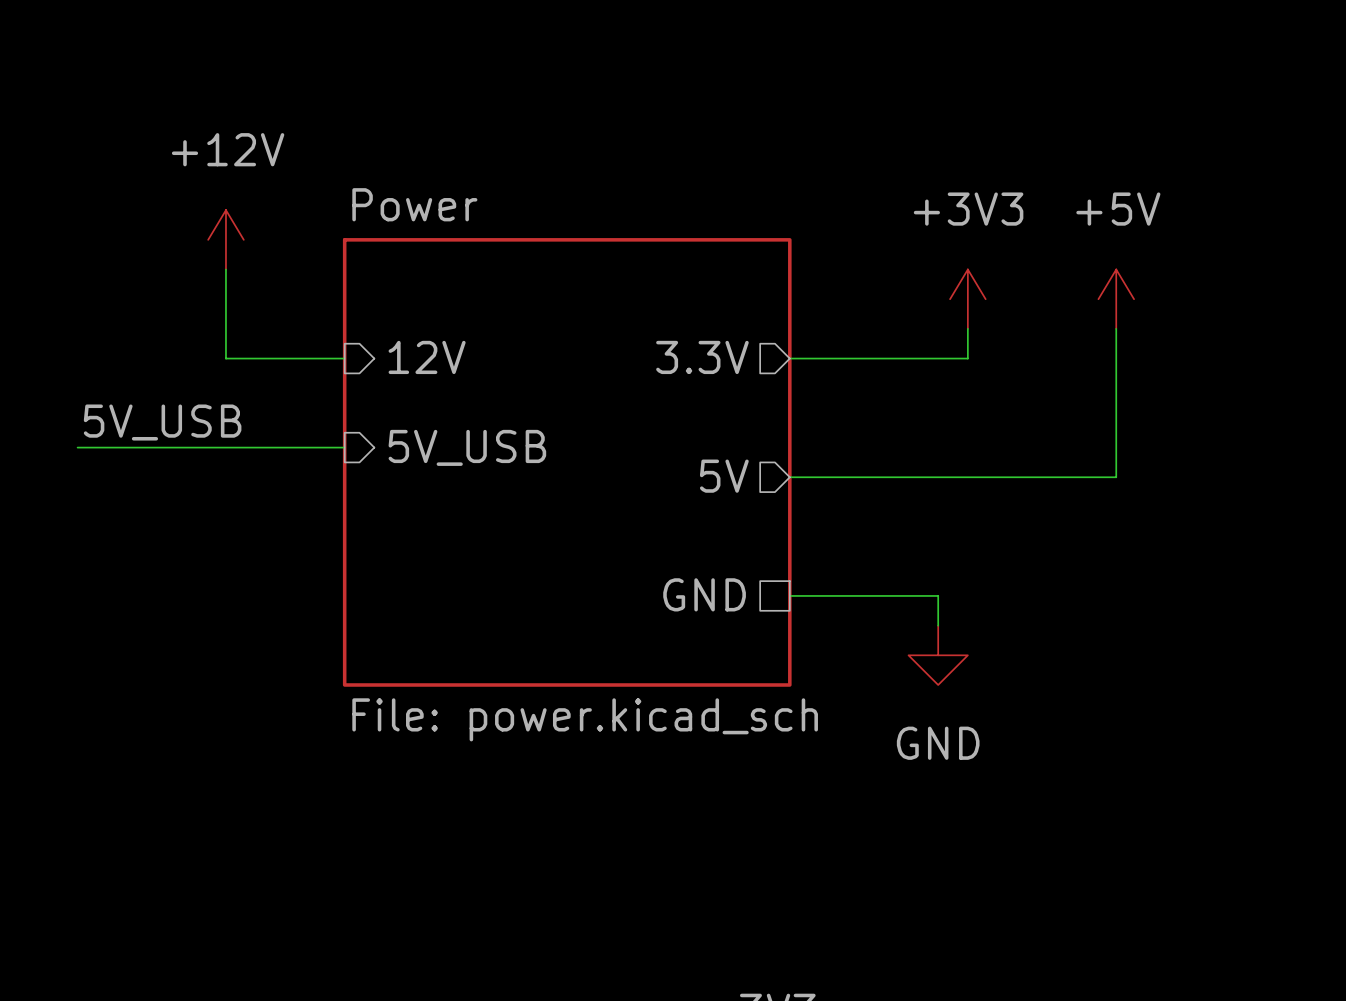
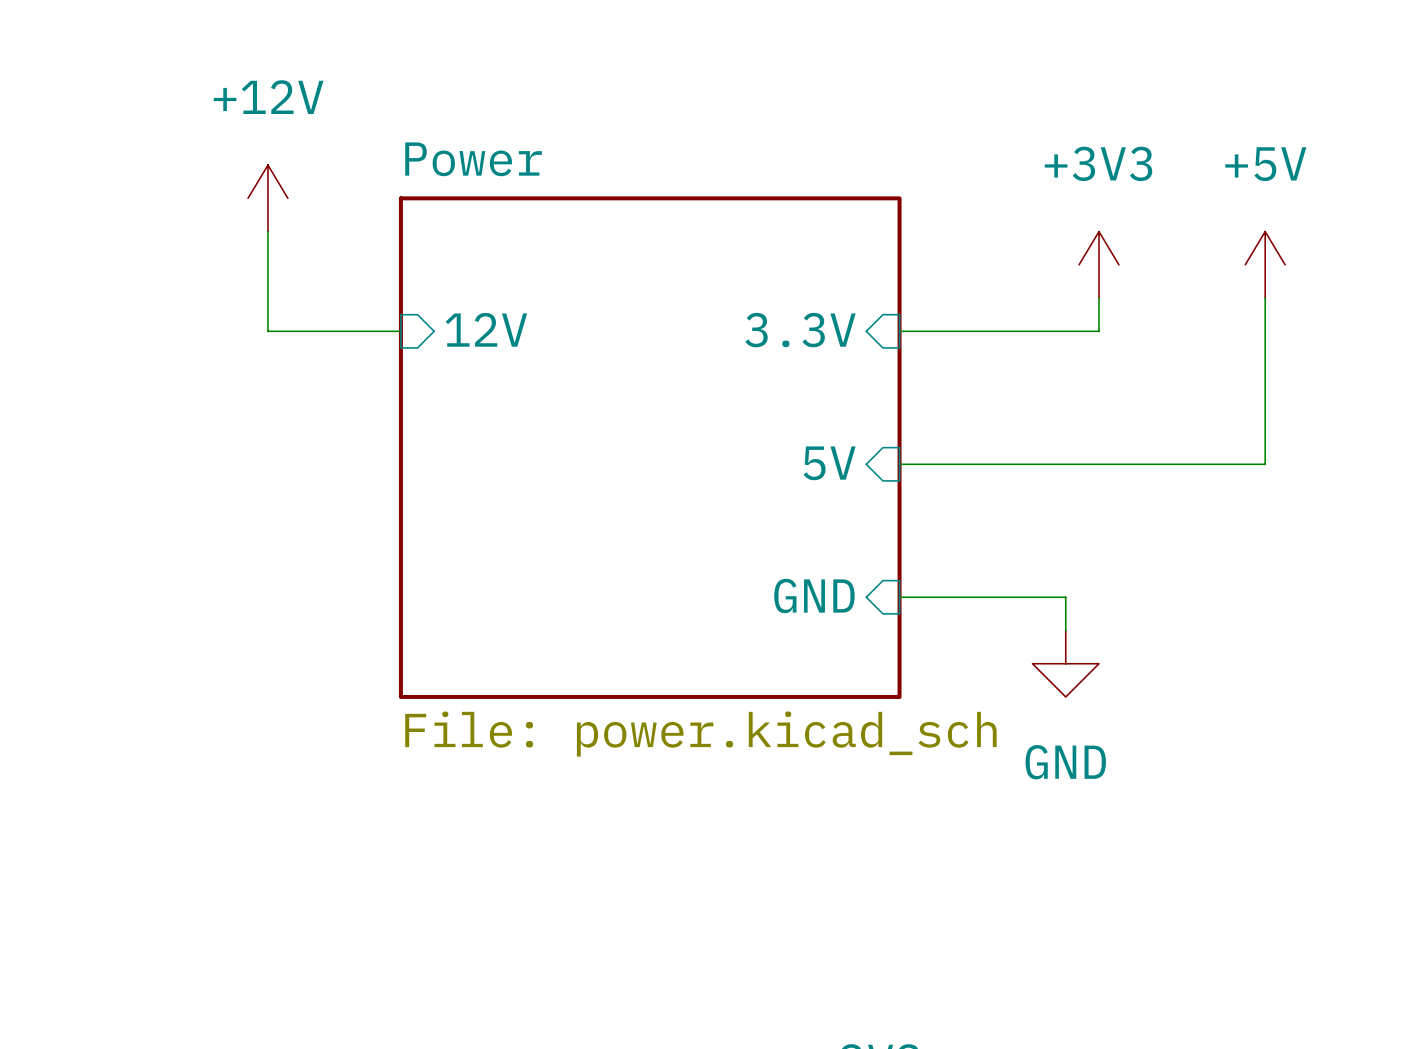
sheet pin shape: output (702, 357) -> input (800, 330)
label: 5V_USB (162, 422) -> none
wire: (77, 447) (344, 447) -> none
sheet pin: 5V_USB (467, 447) -> none
sheet pin shape: output (724, 476) -> input (829, 463)
sheet pin shape: passive (704, 594) -> input (814, 596)

